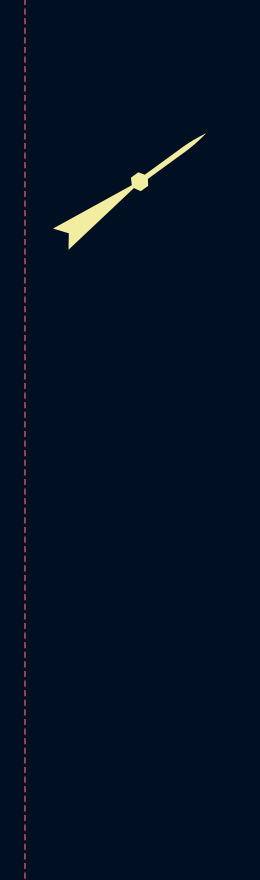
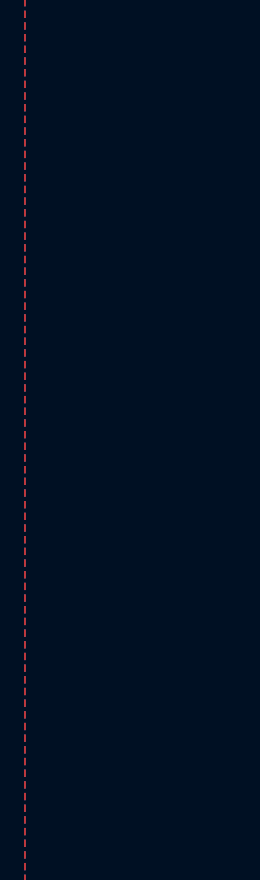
drawing: [53, 133, 206, 250] -> none

